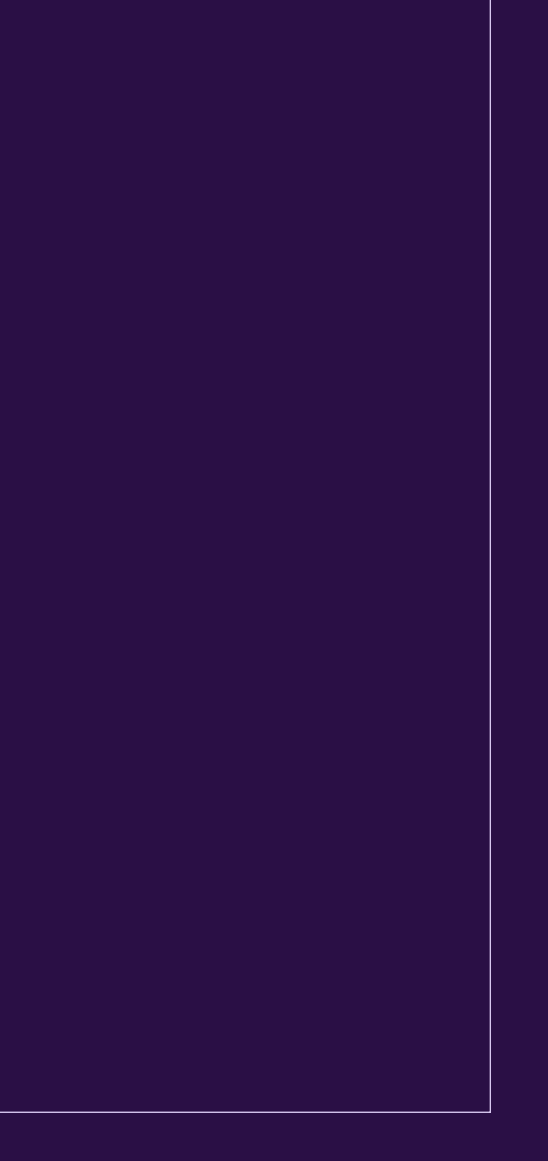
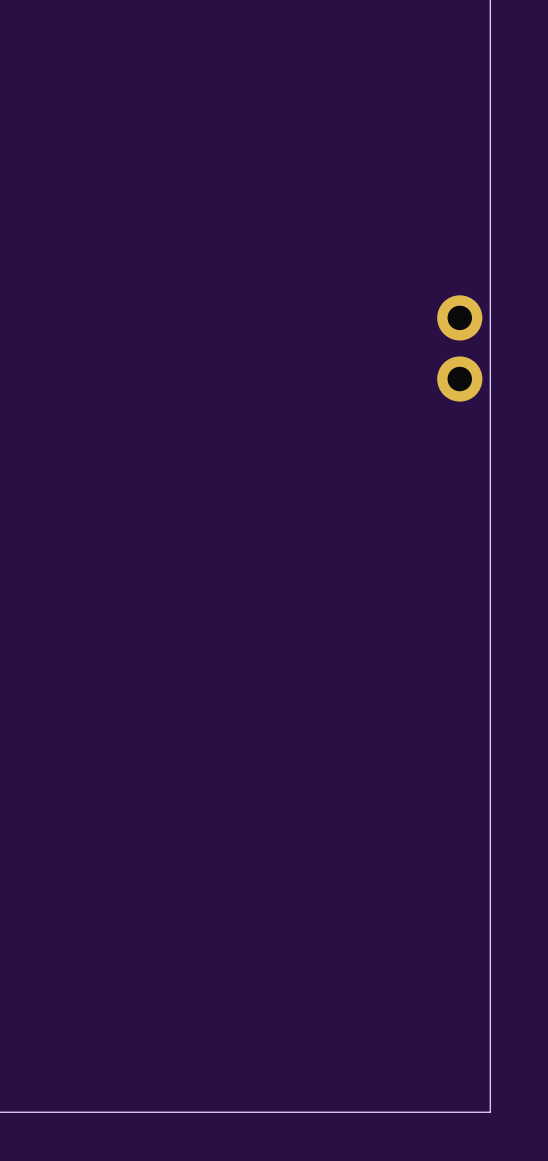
part: none -> (459, 348)

